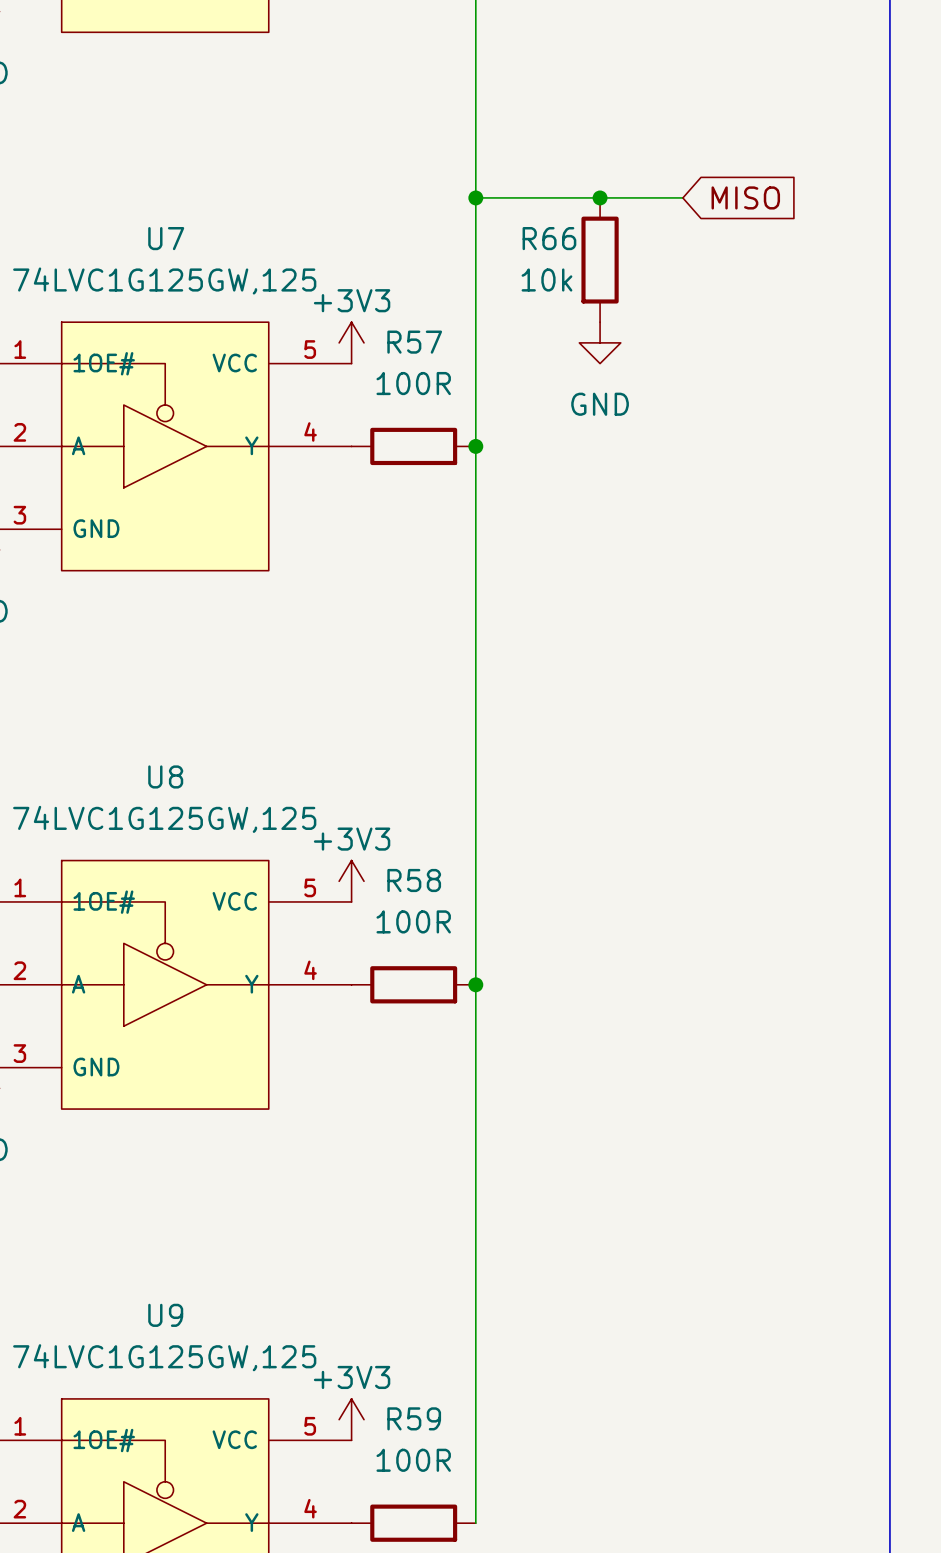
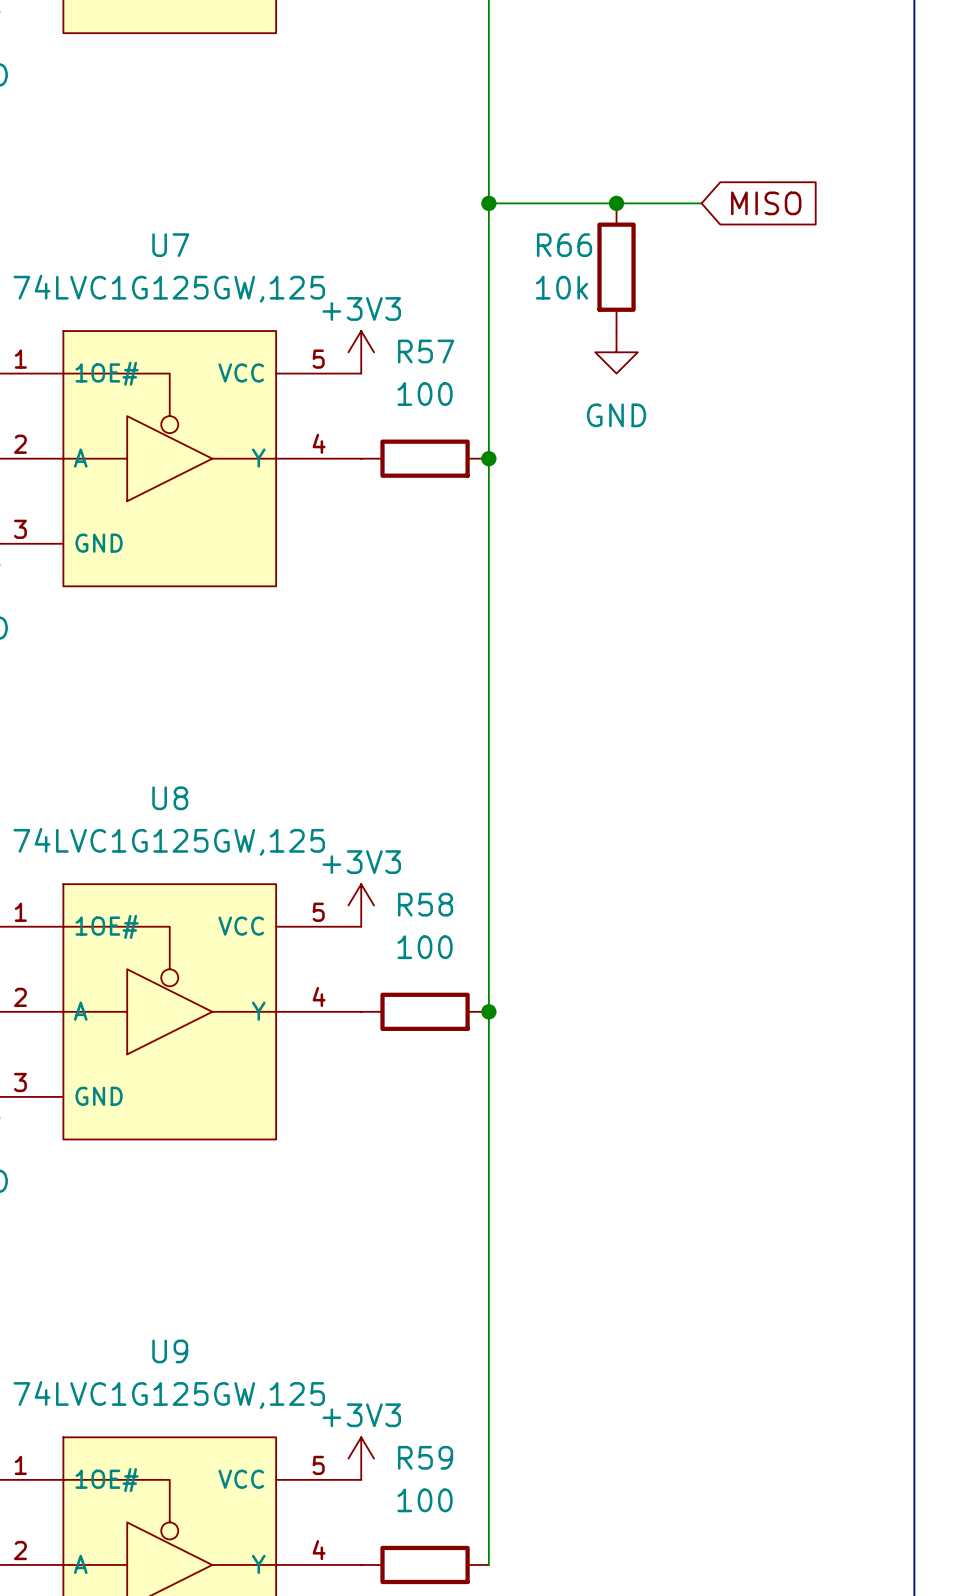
R57 value: 100R (413, 383) -> 100 (425, 394)
R58 value: 100R (413, 921) -> 100 (425, 947)
R59 value: 100R (413, 1460) -> 100 (425, 1500)

